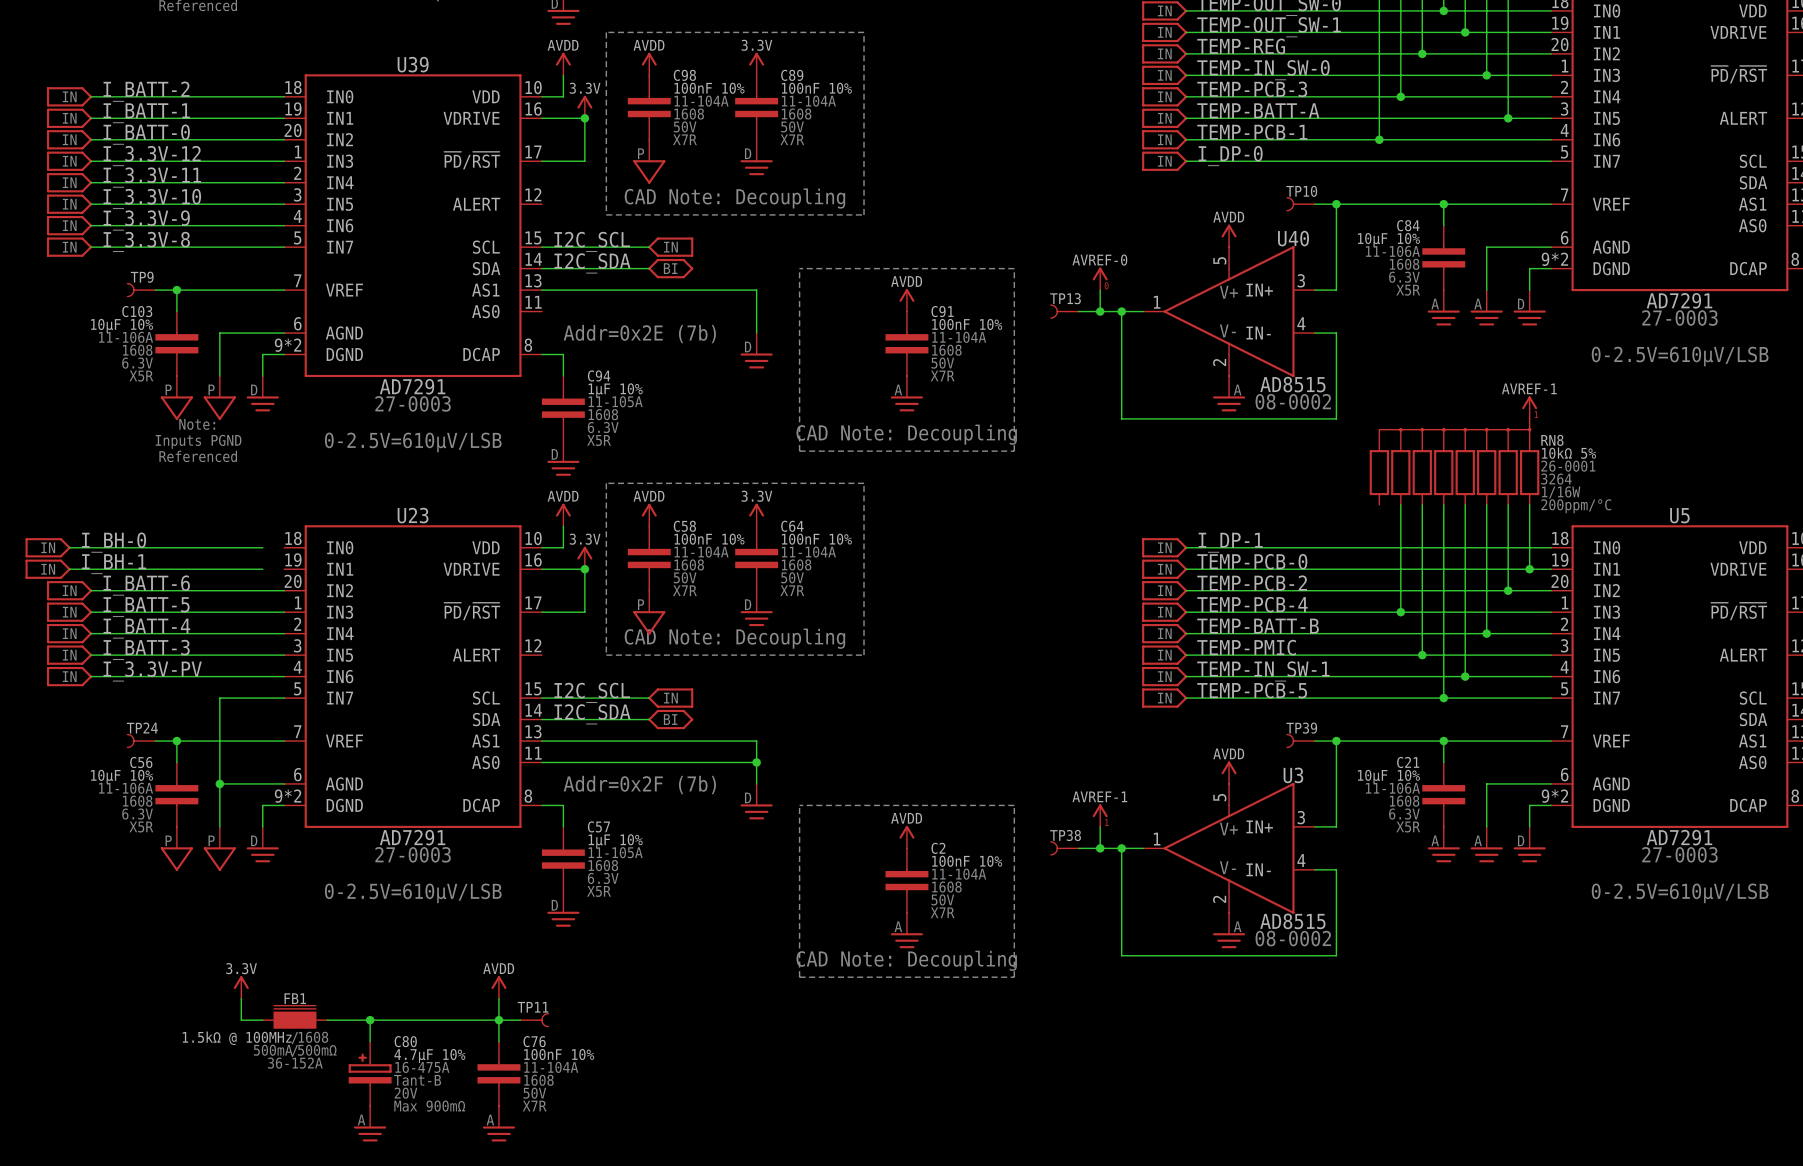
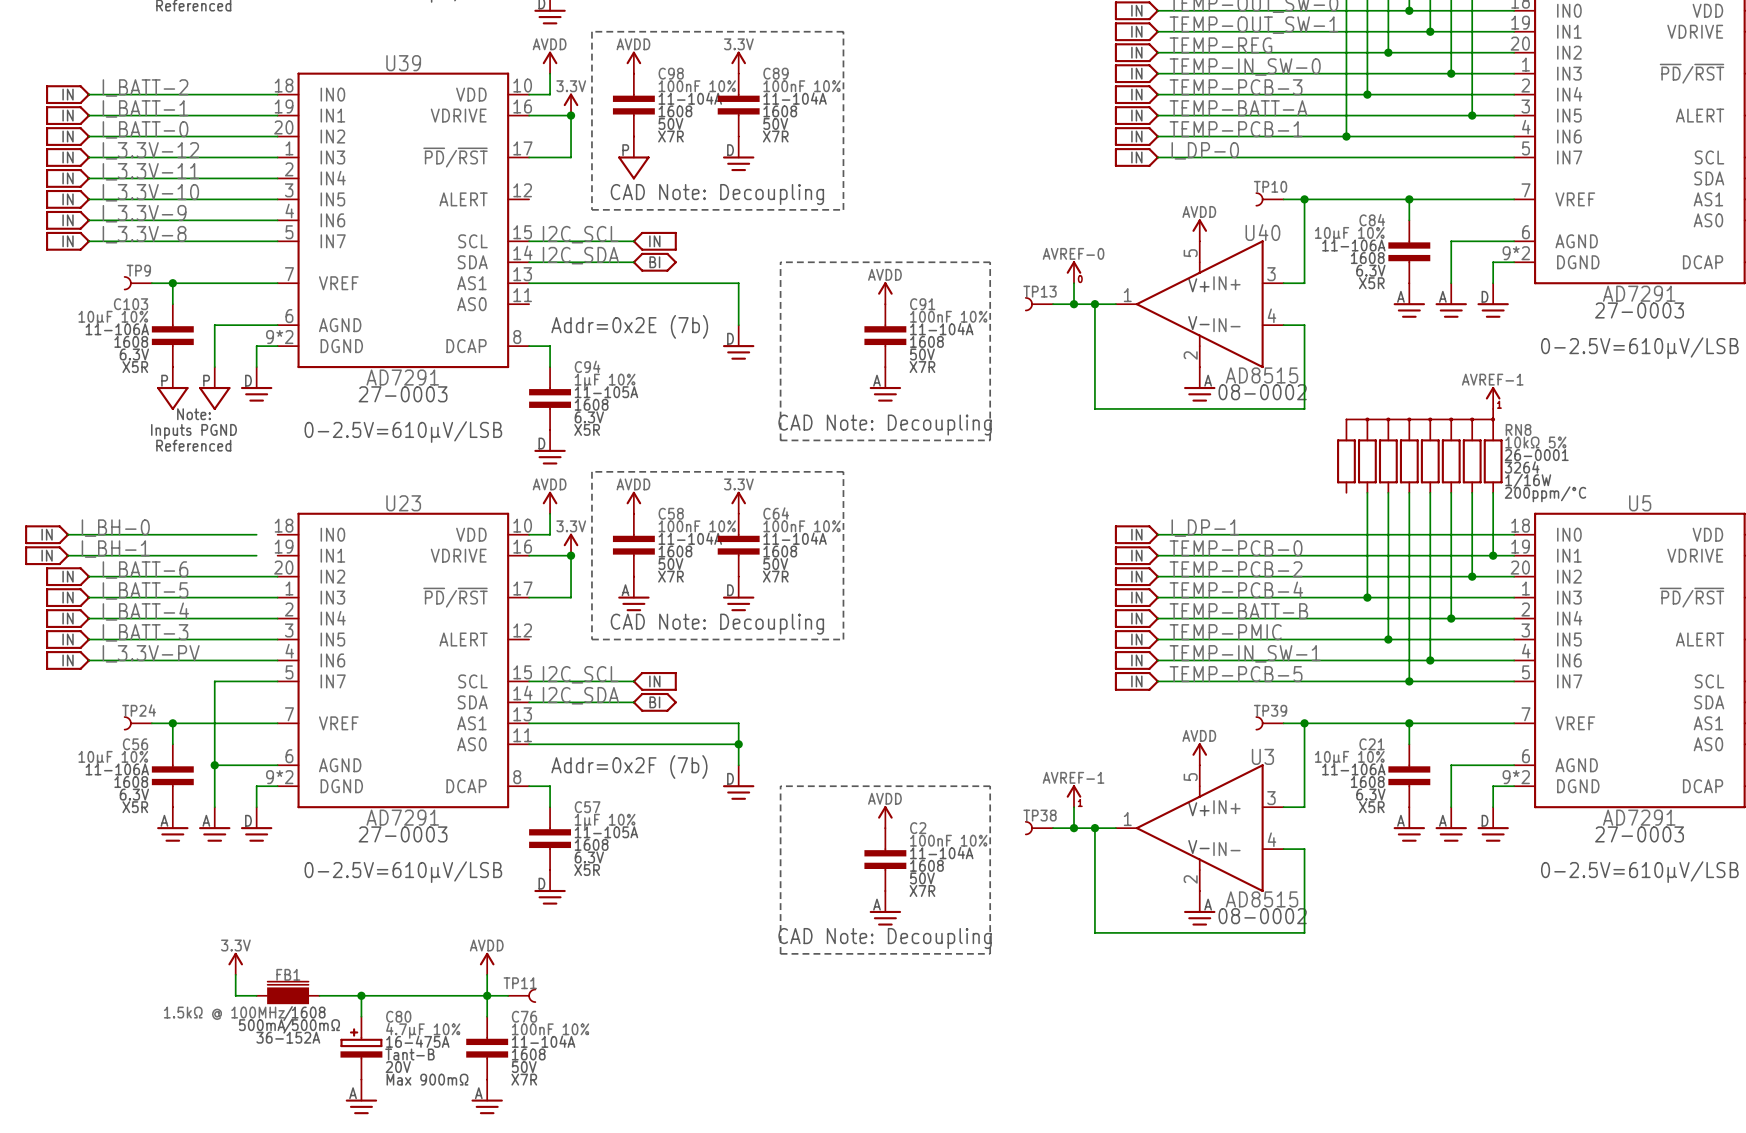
power symbol shape: [633, 590, 666, 635] -> [618, 576, 650, 612]
power symbol shape: [160, 826, 193, 871] -> [157, 807, 189, 842]
power symbol shape: [203, 826, 236, 871] -> [199, 807, 231, 842]

